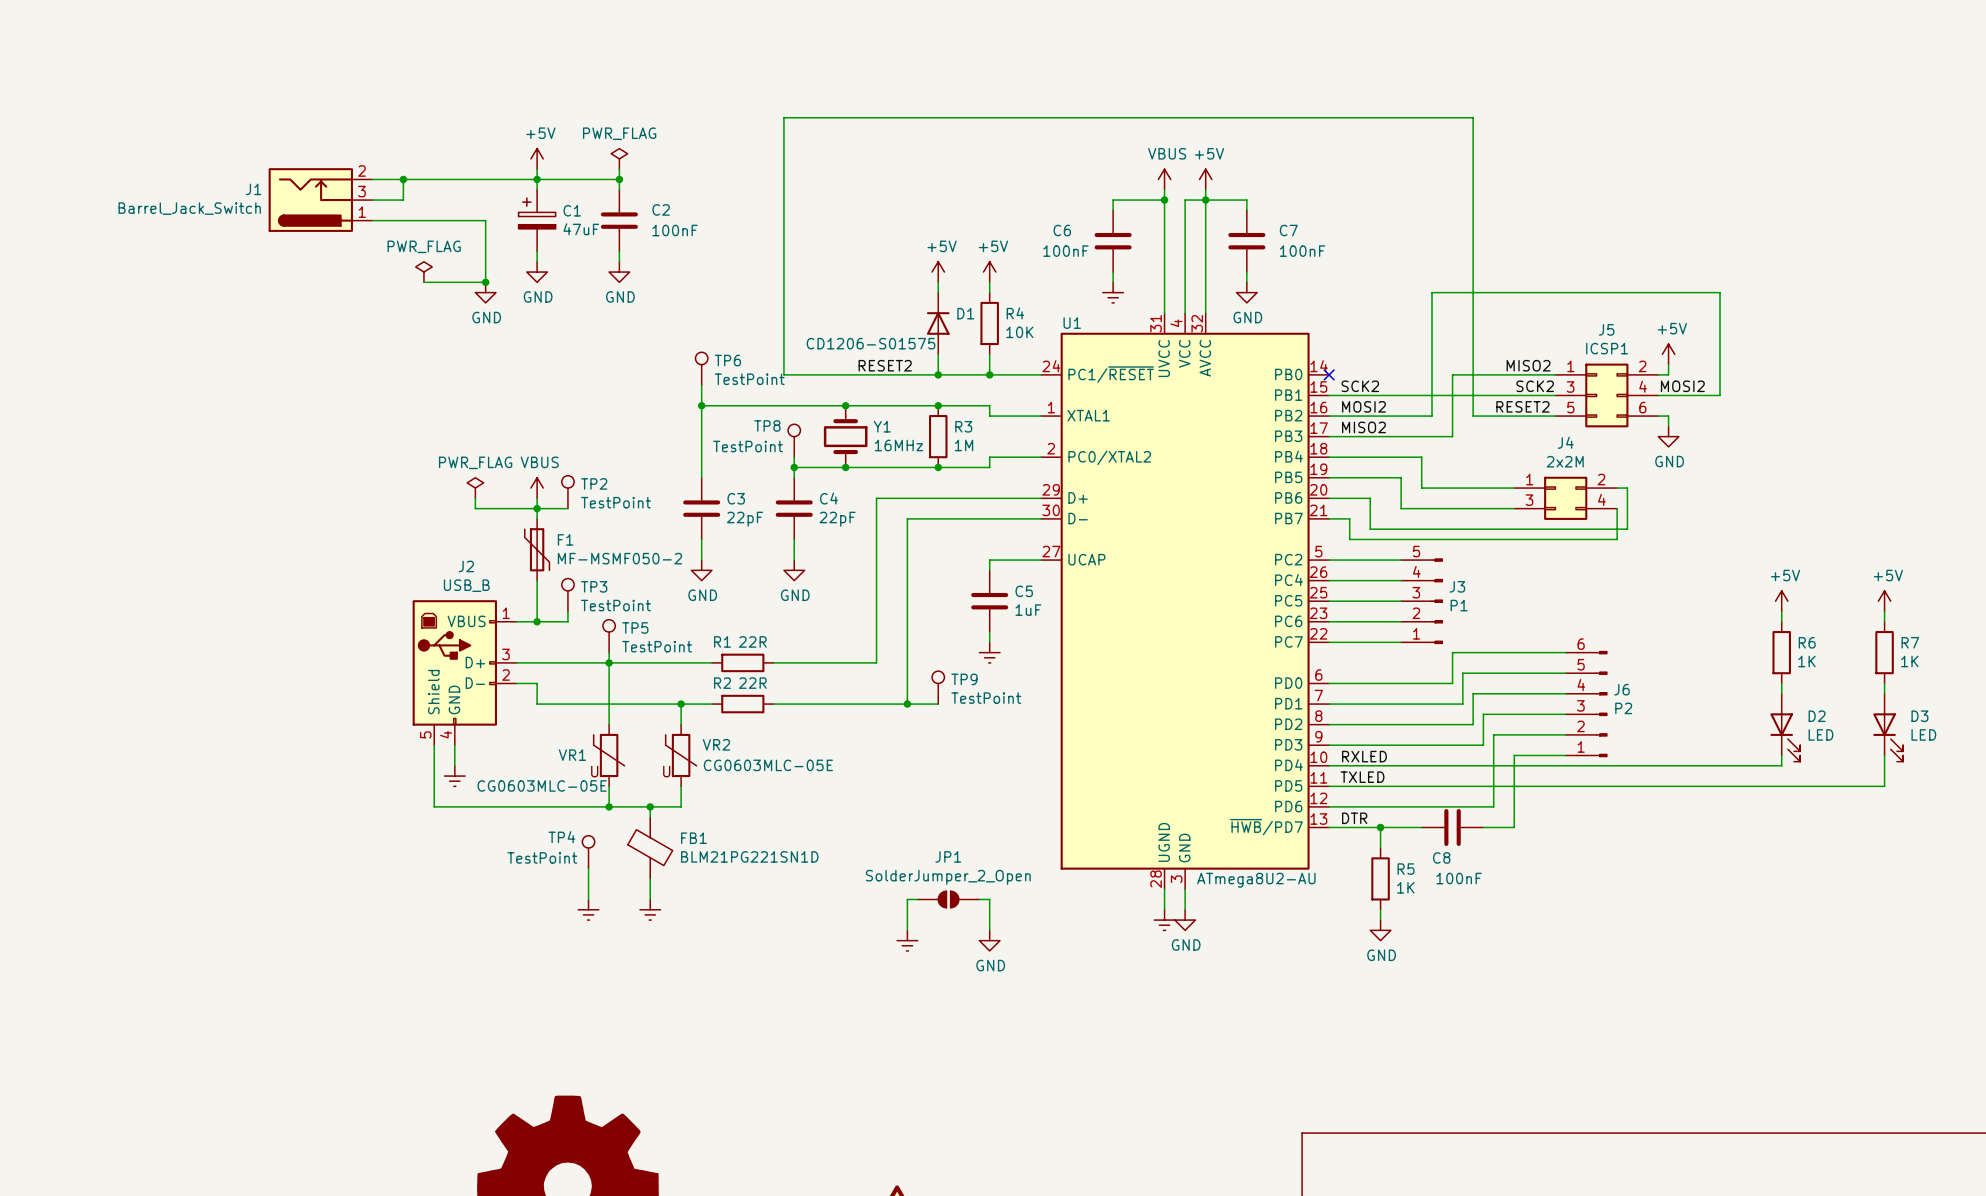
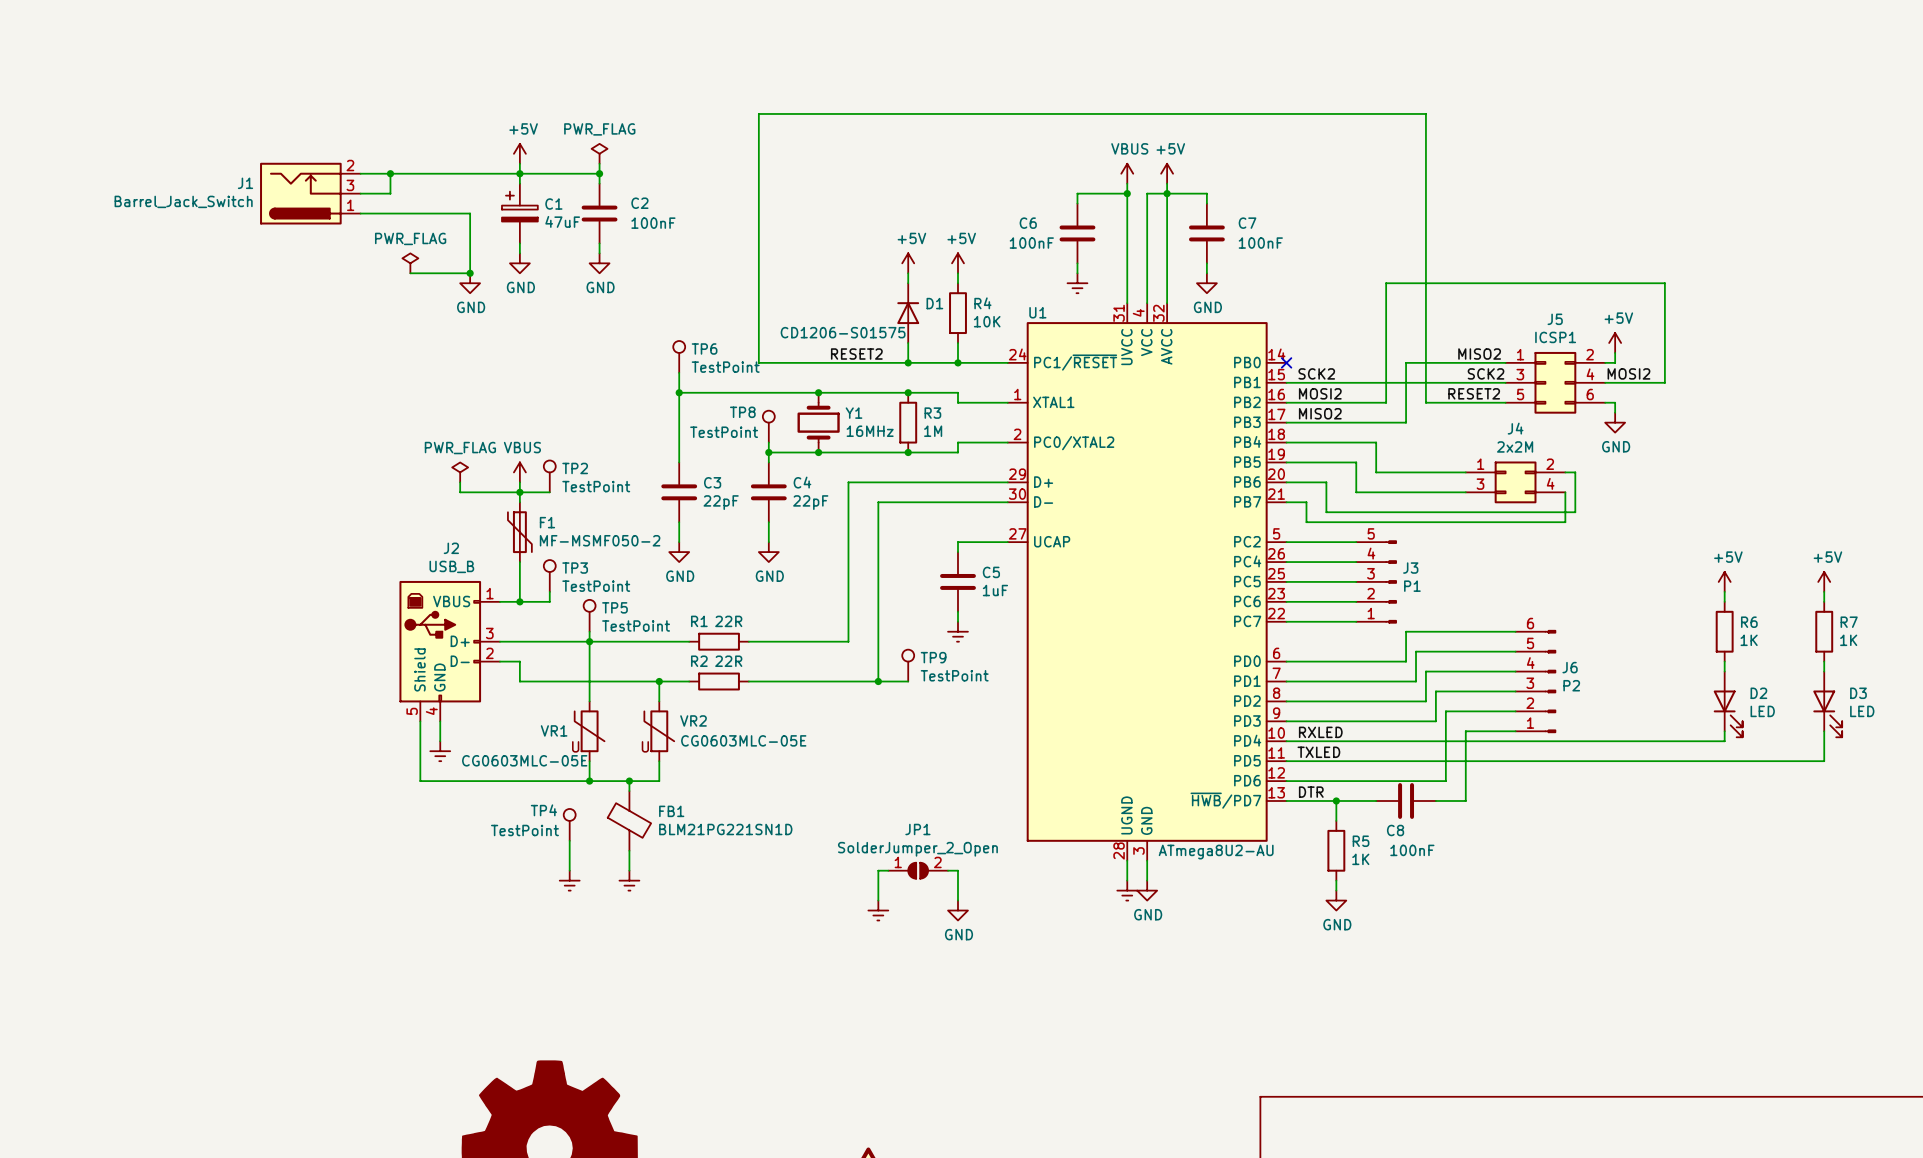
JP1 pin number: none -> 1 (898, 862)
JP1 pin number: none -> 2 (937, 862)

